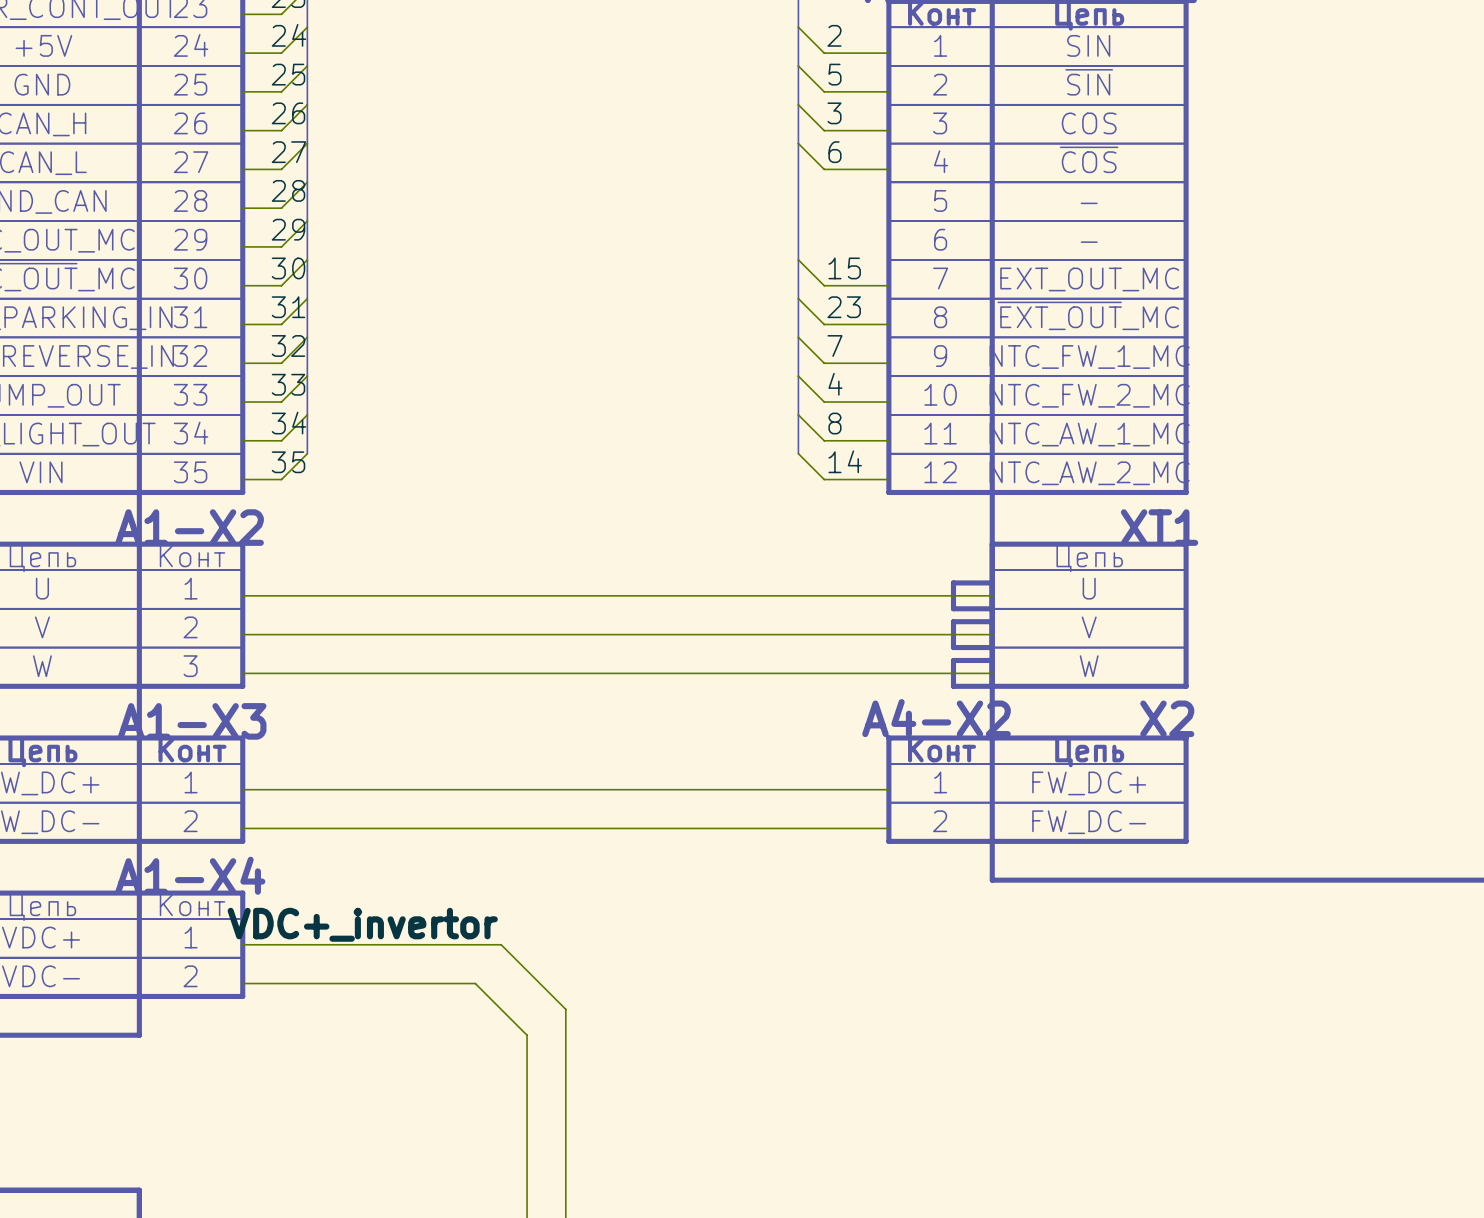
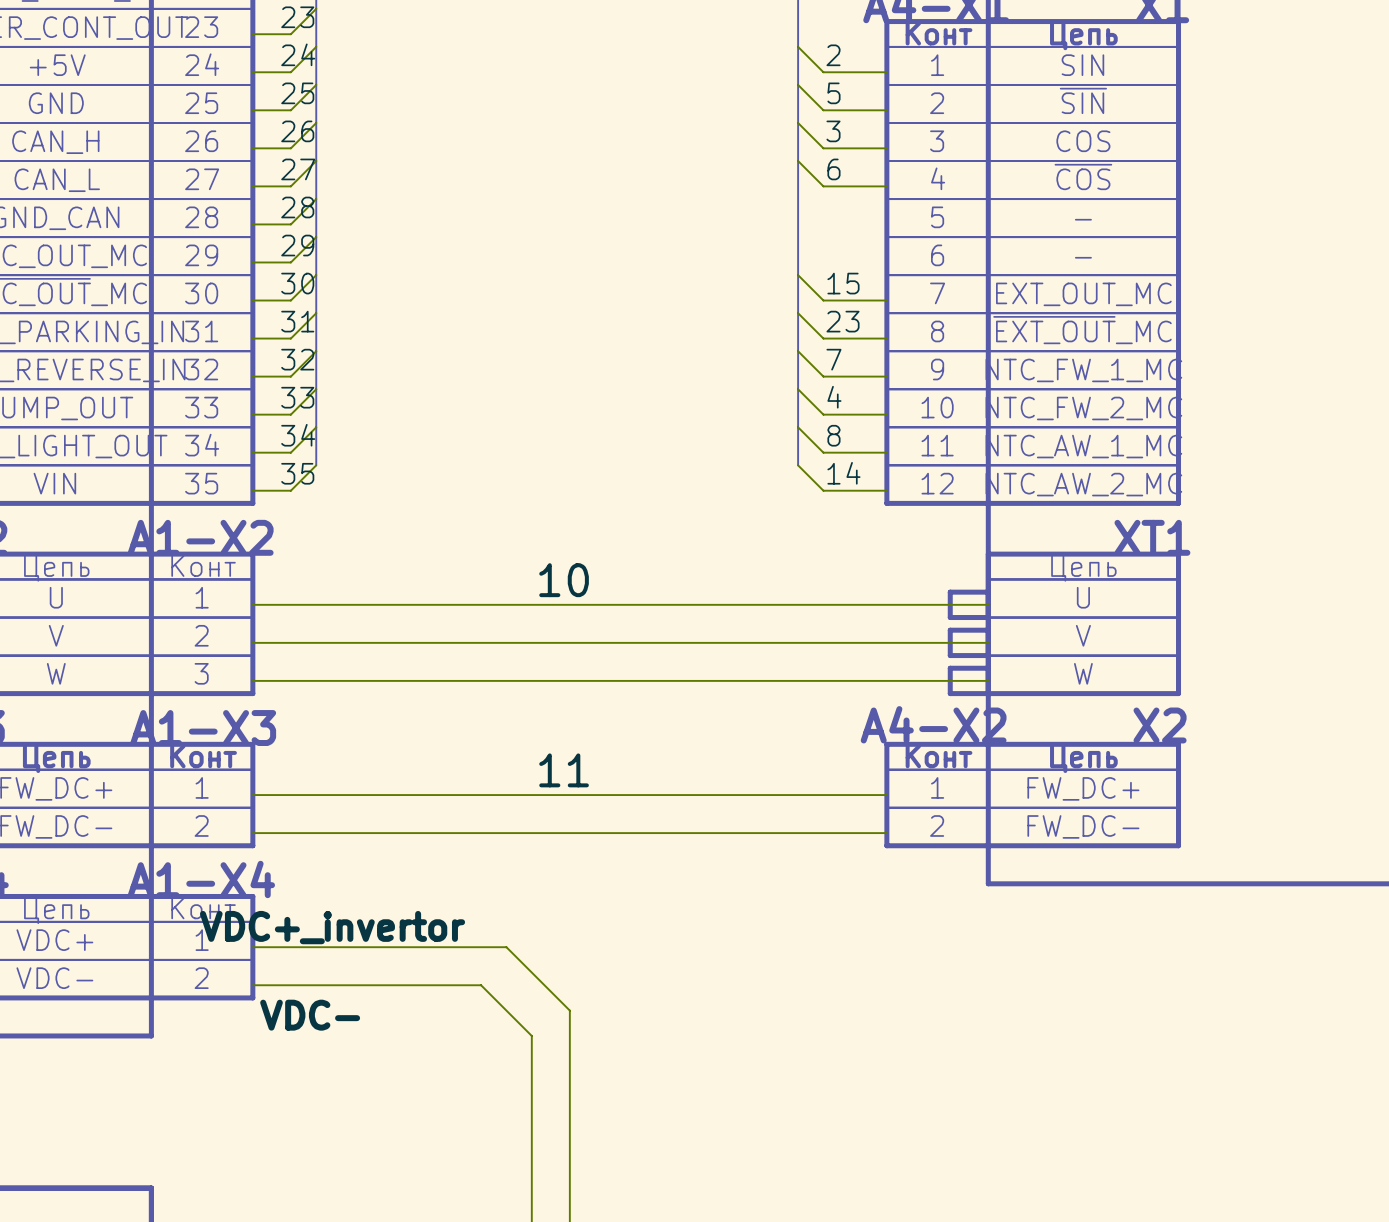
label: none -> 10 (564, 580)
label: none -> 11 (564, 770)
label position: VDC+_invertor (362, 924) -> VDC+_invertor (332, 927)
label: none -> VDC- (310, 1015)

